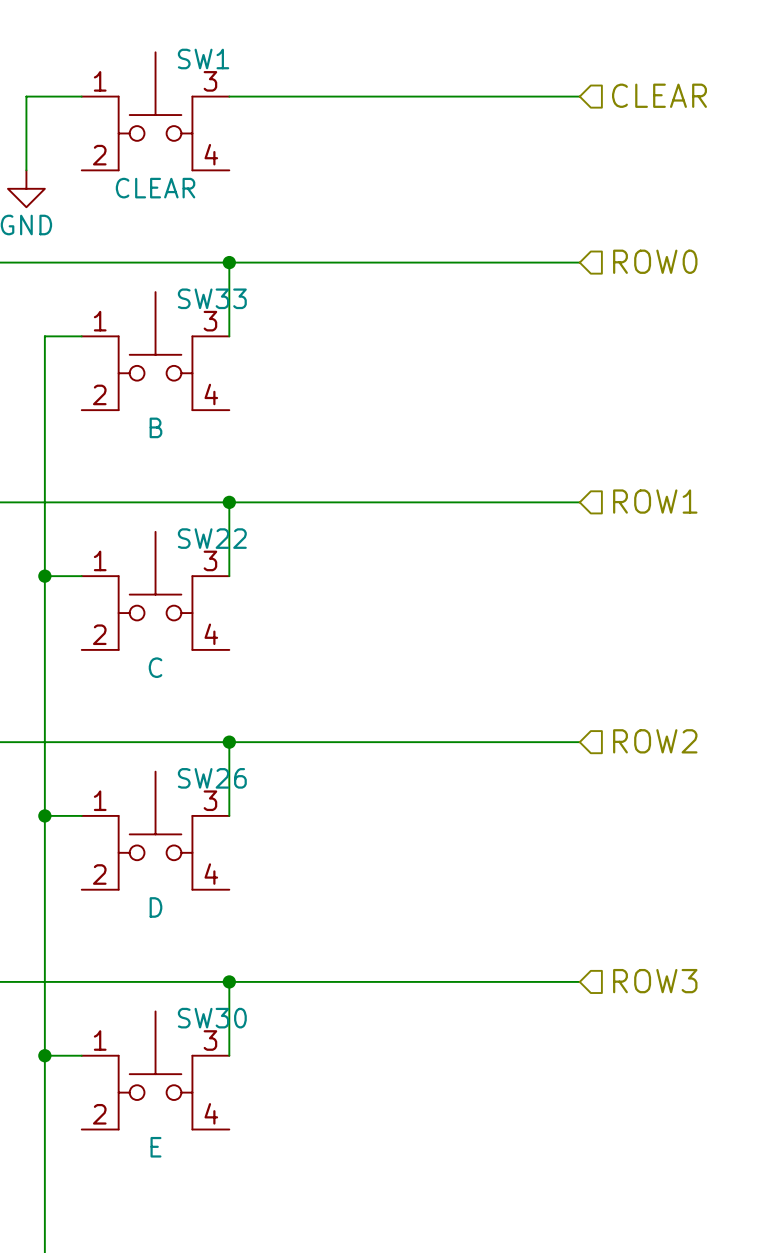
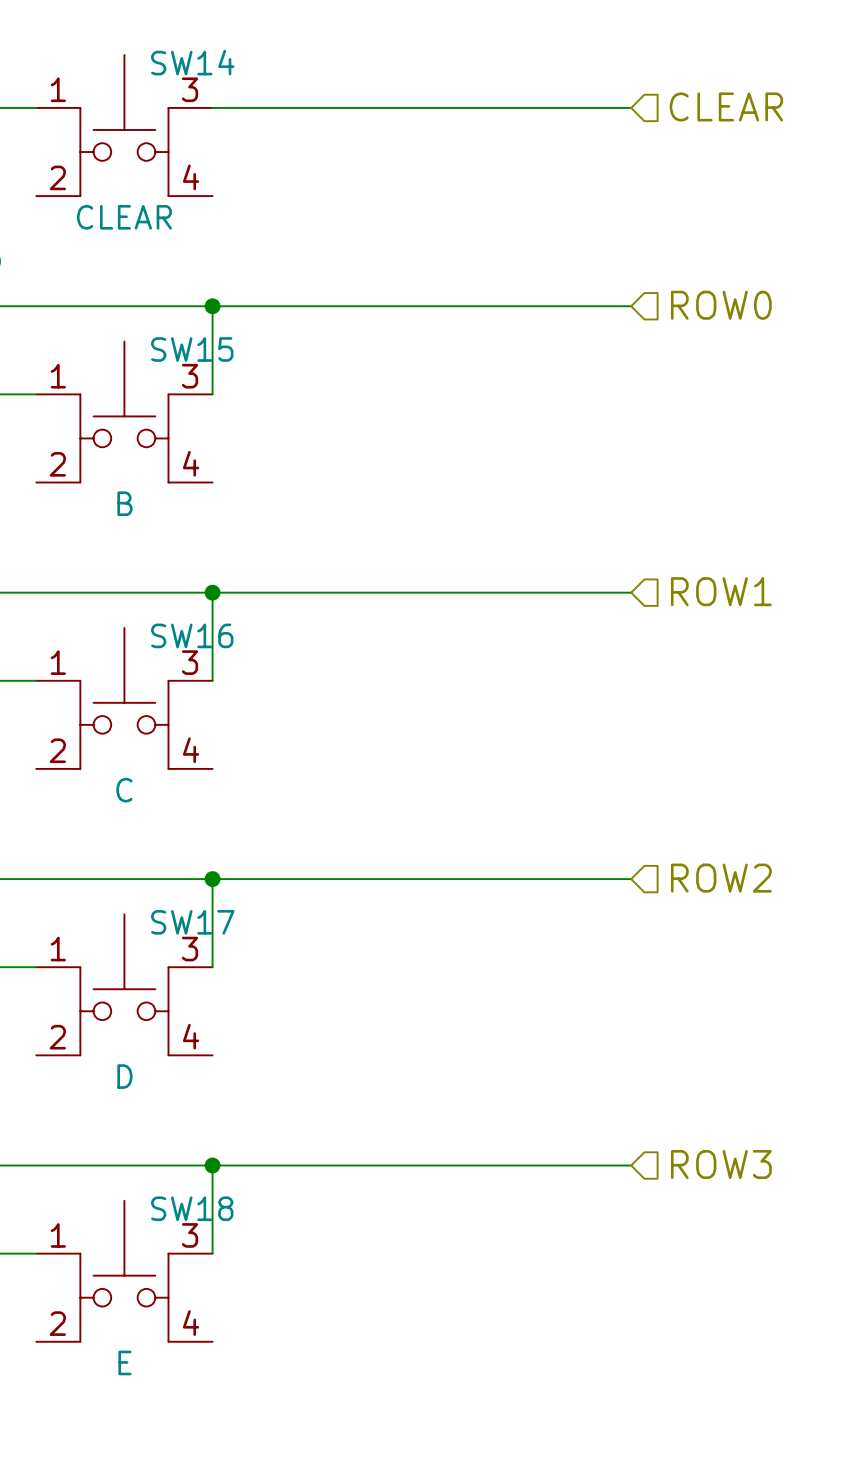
SW1 name: SW1 (203, 59) -> SW14 (192, 62)
SW33 name: SW33 (212, 298) -> SW15 (192, 349)
SW22 name: SW22 (212, 538) -> SW16 (192, 635)
SW26 name: SW26 (212, 778) -> SW17 (192, 922)
SW30 name: SW30 (212, 1018) -> SW18 (192, 1208)

